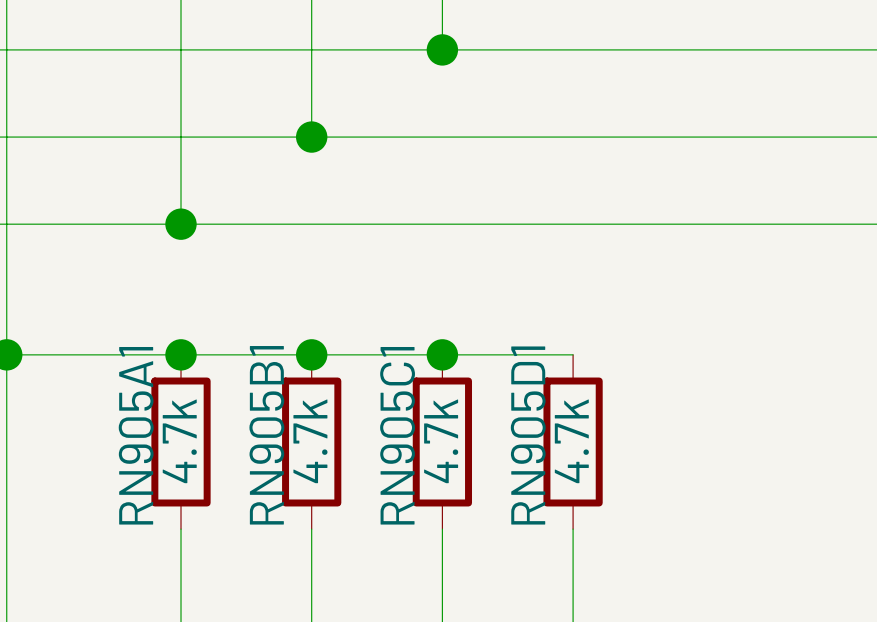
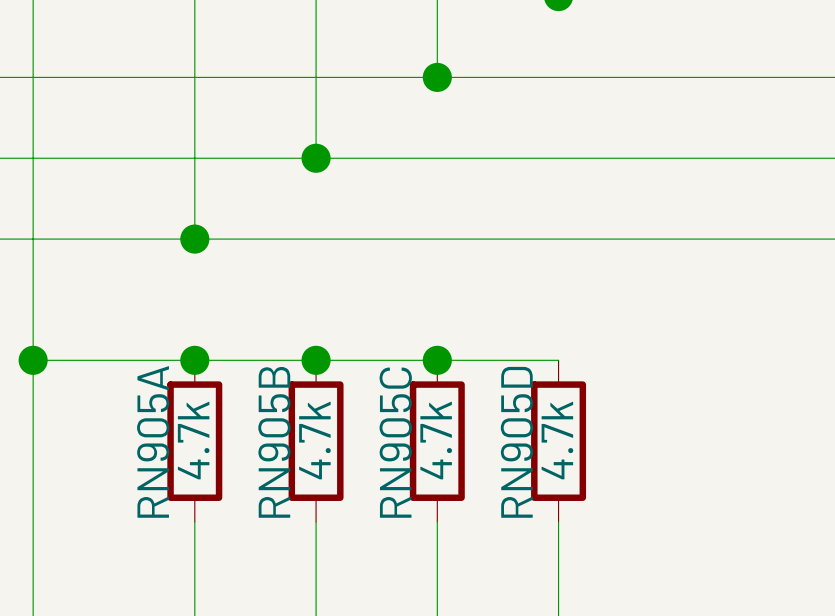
RN905A1 name: RN905A1 (136, 435) -> RN905A (153, 441)
RN905B1 name: RN905B1 (266, 435) -> RN905B (274, 442)
RN905C1 name: RN905C1 (397, 435) -> RN905C (395, 442)
RN905D1 name: RN905D1 (528, 435) -> RN905D (516, 442)

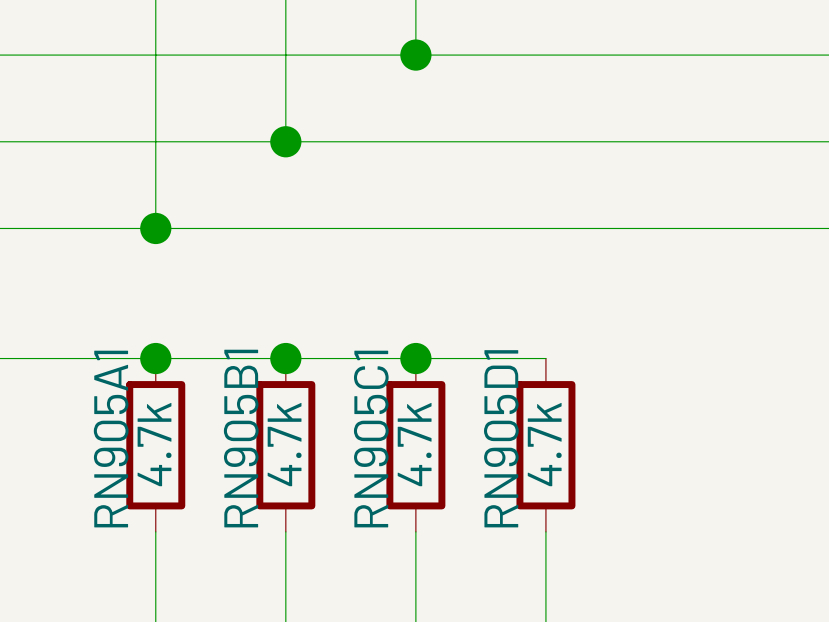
RN905A name: RN905A (153, 441) -> RN905A1 (111, 439)
RN905B name: RN905B (274, 442) -> RN905B1 (241, 438)
RN905C name: RN905C (395, 442) -> RN905C1 (371, 439)
RN905D name: RN905D (516, 442) -> RN905D1 (501, 438)

